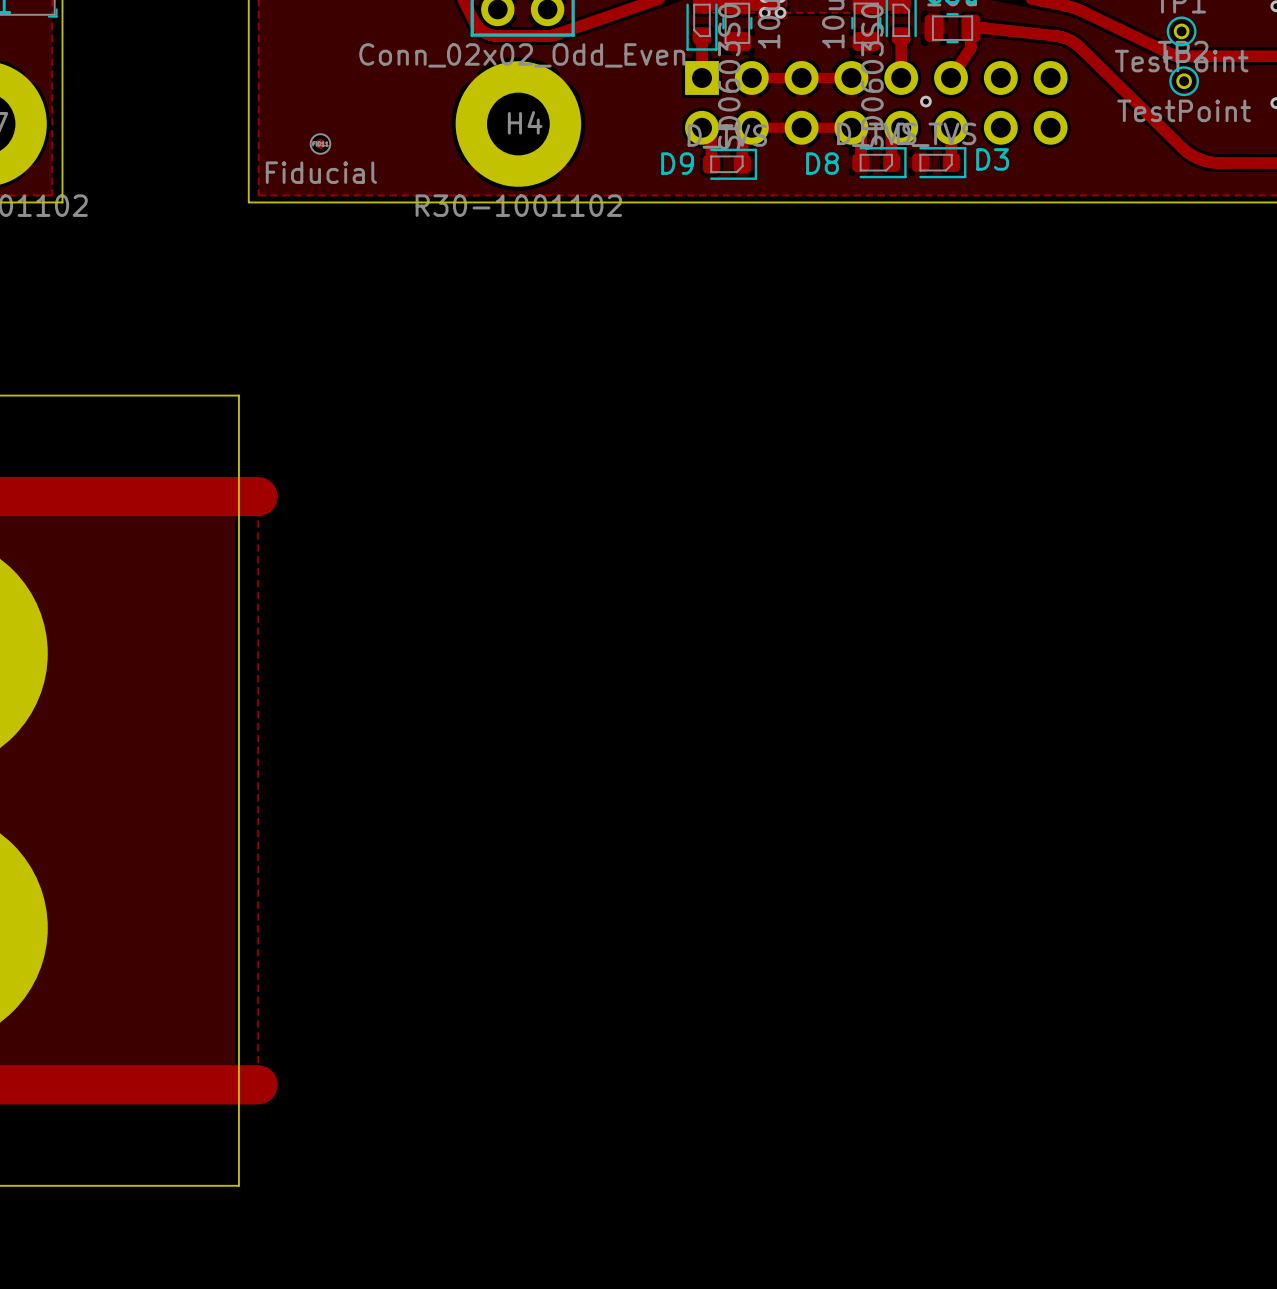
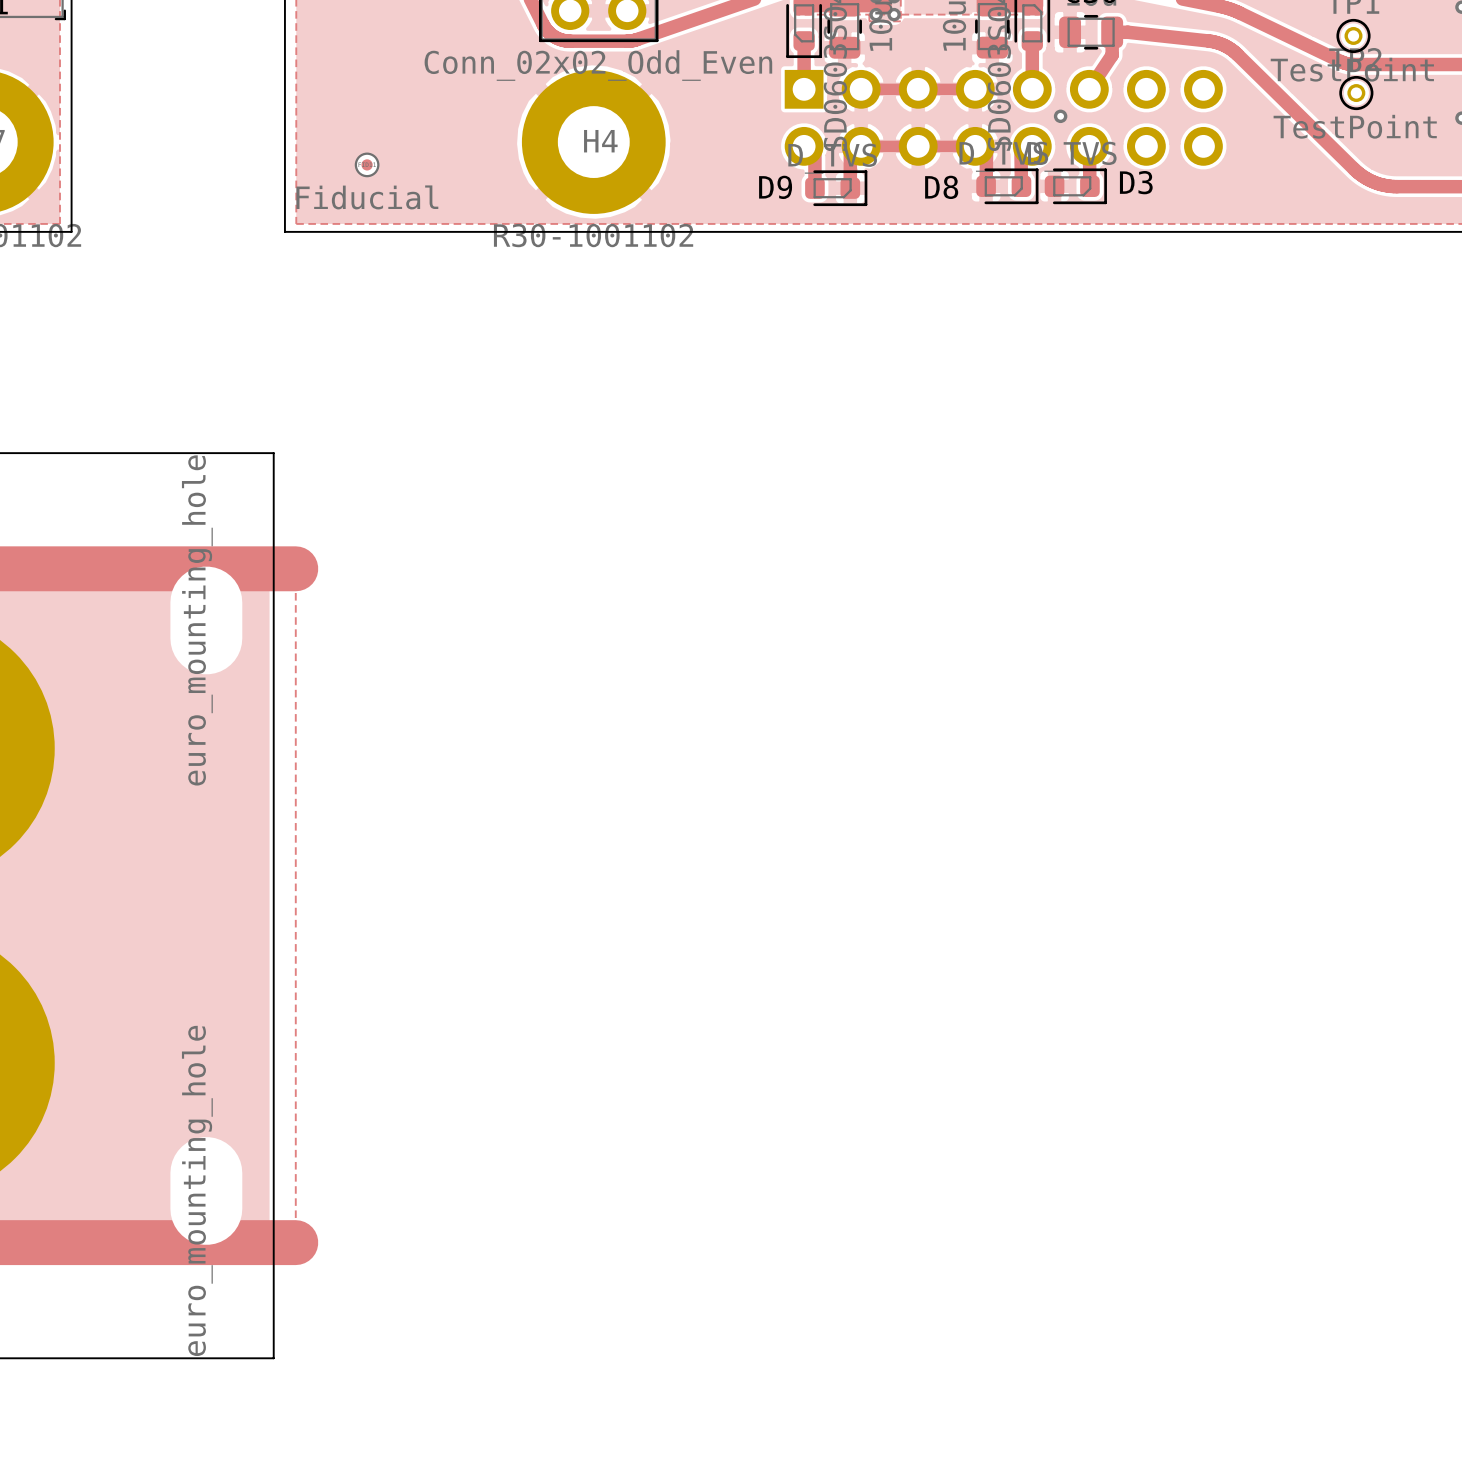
part: none -> euro_mounting_hole (206, 620)
part: none -> euro_mounting_hole (206, 1190)

